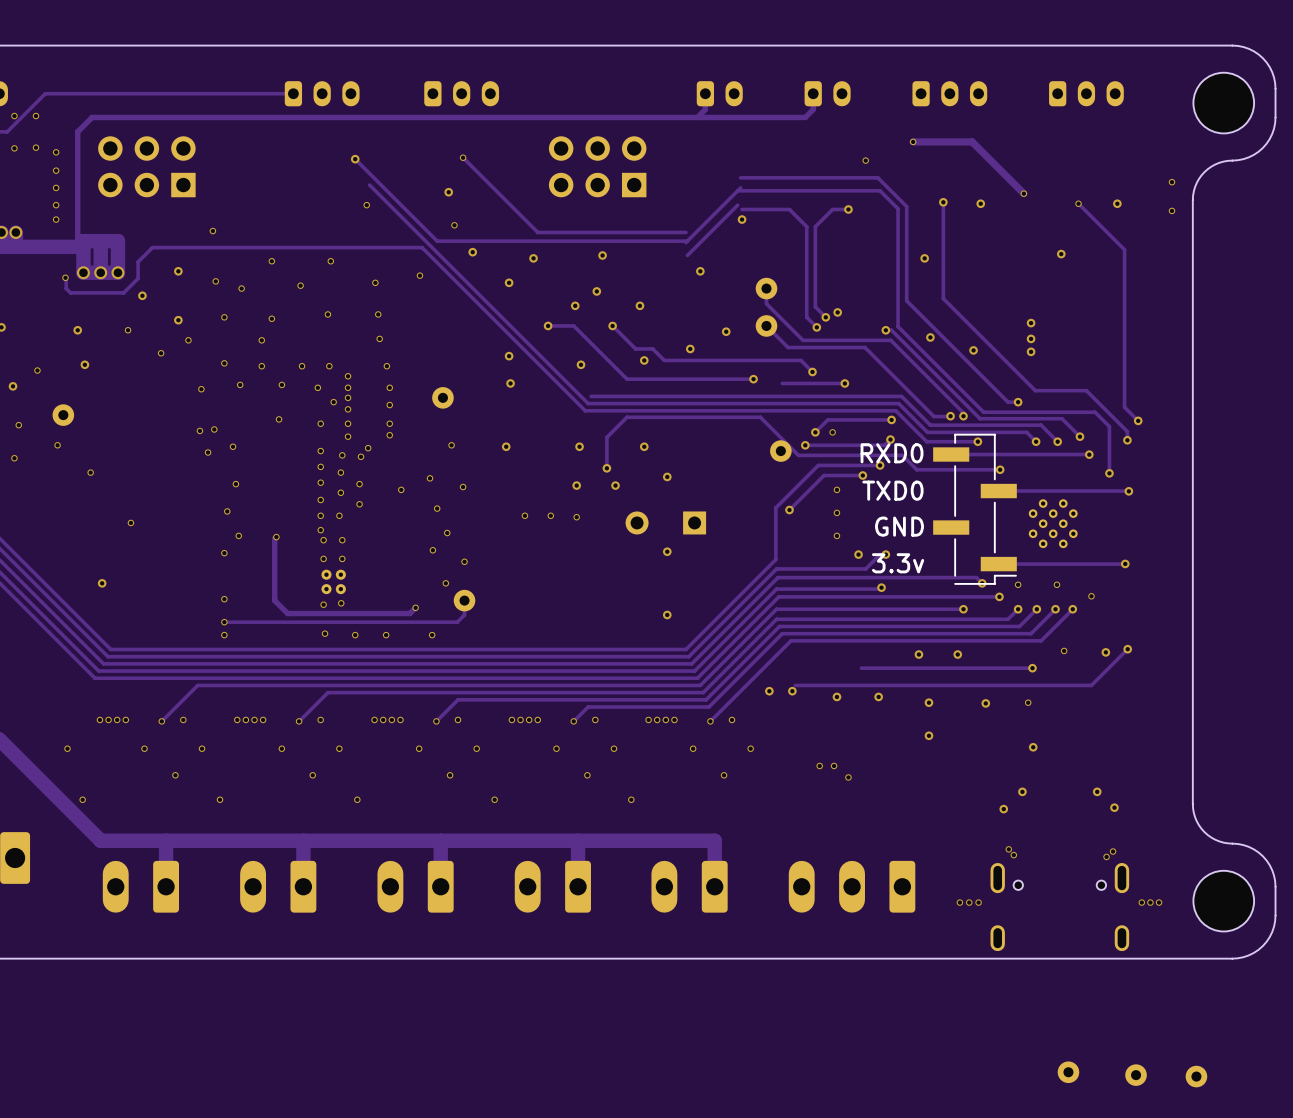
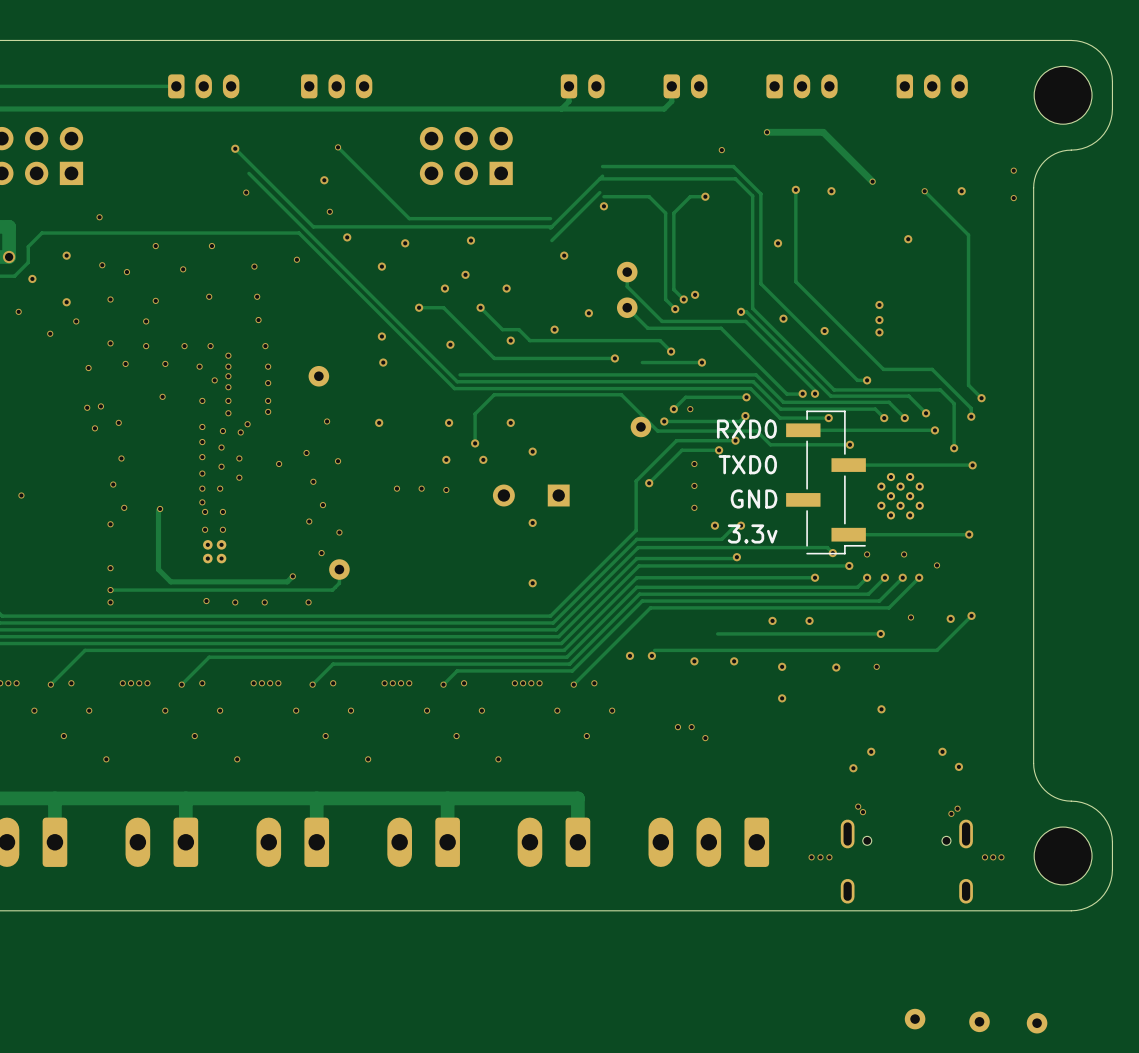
via: (341, 603) -> none
via: (323, 604) -> none

